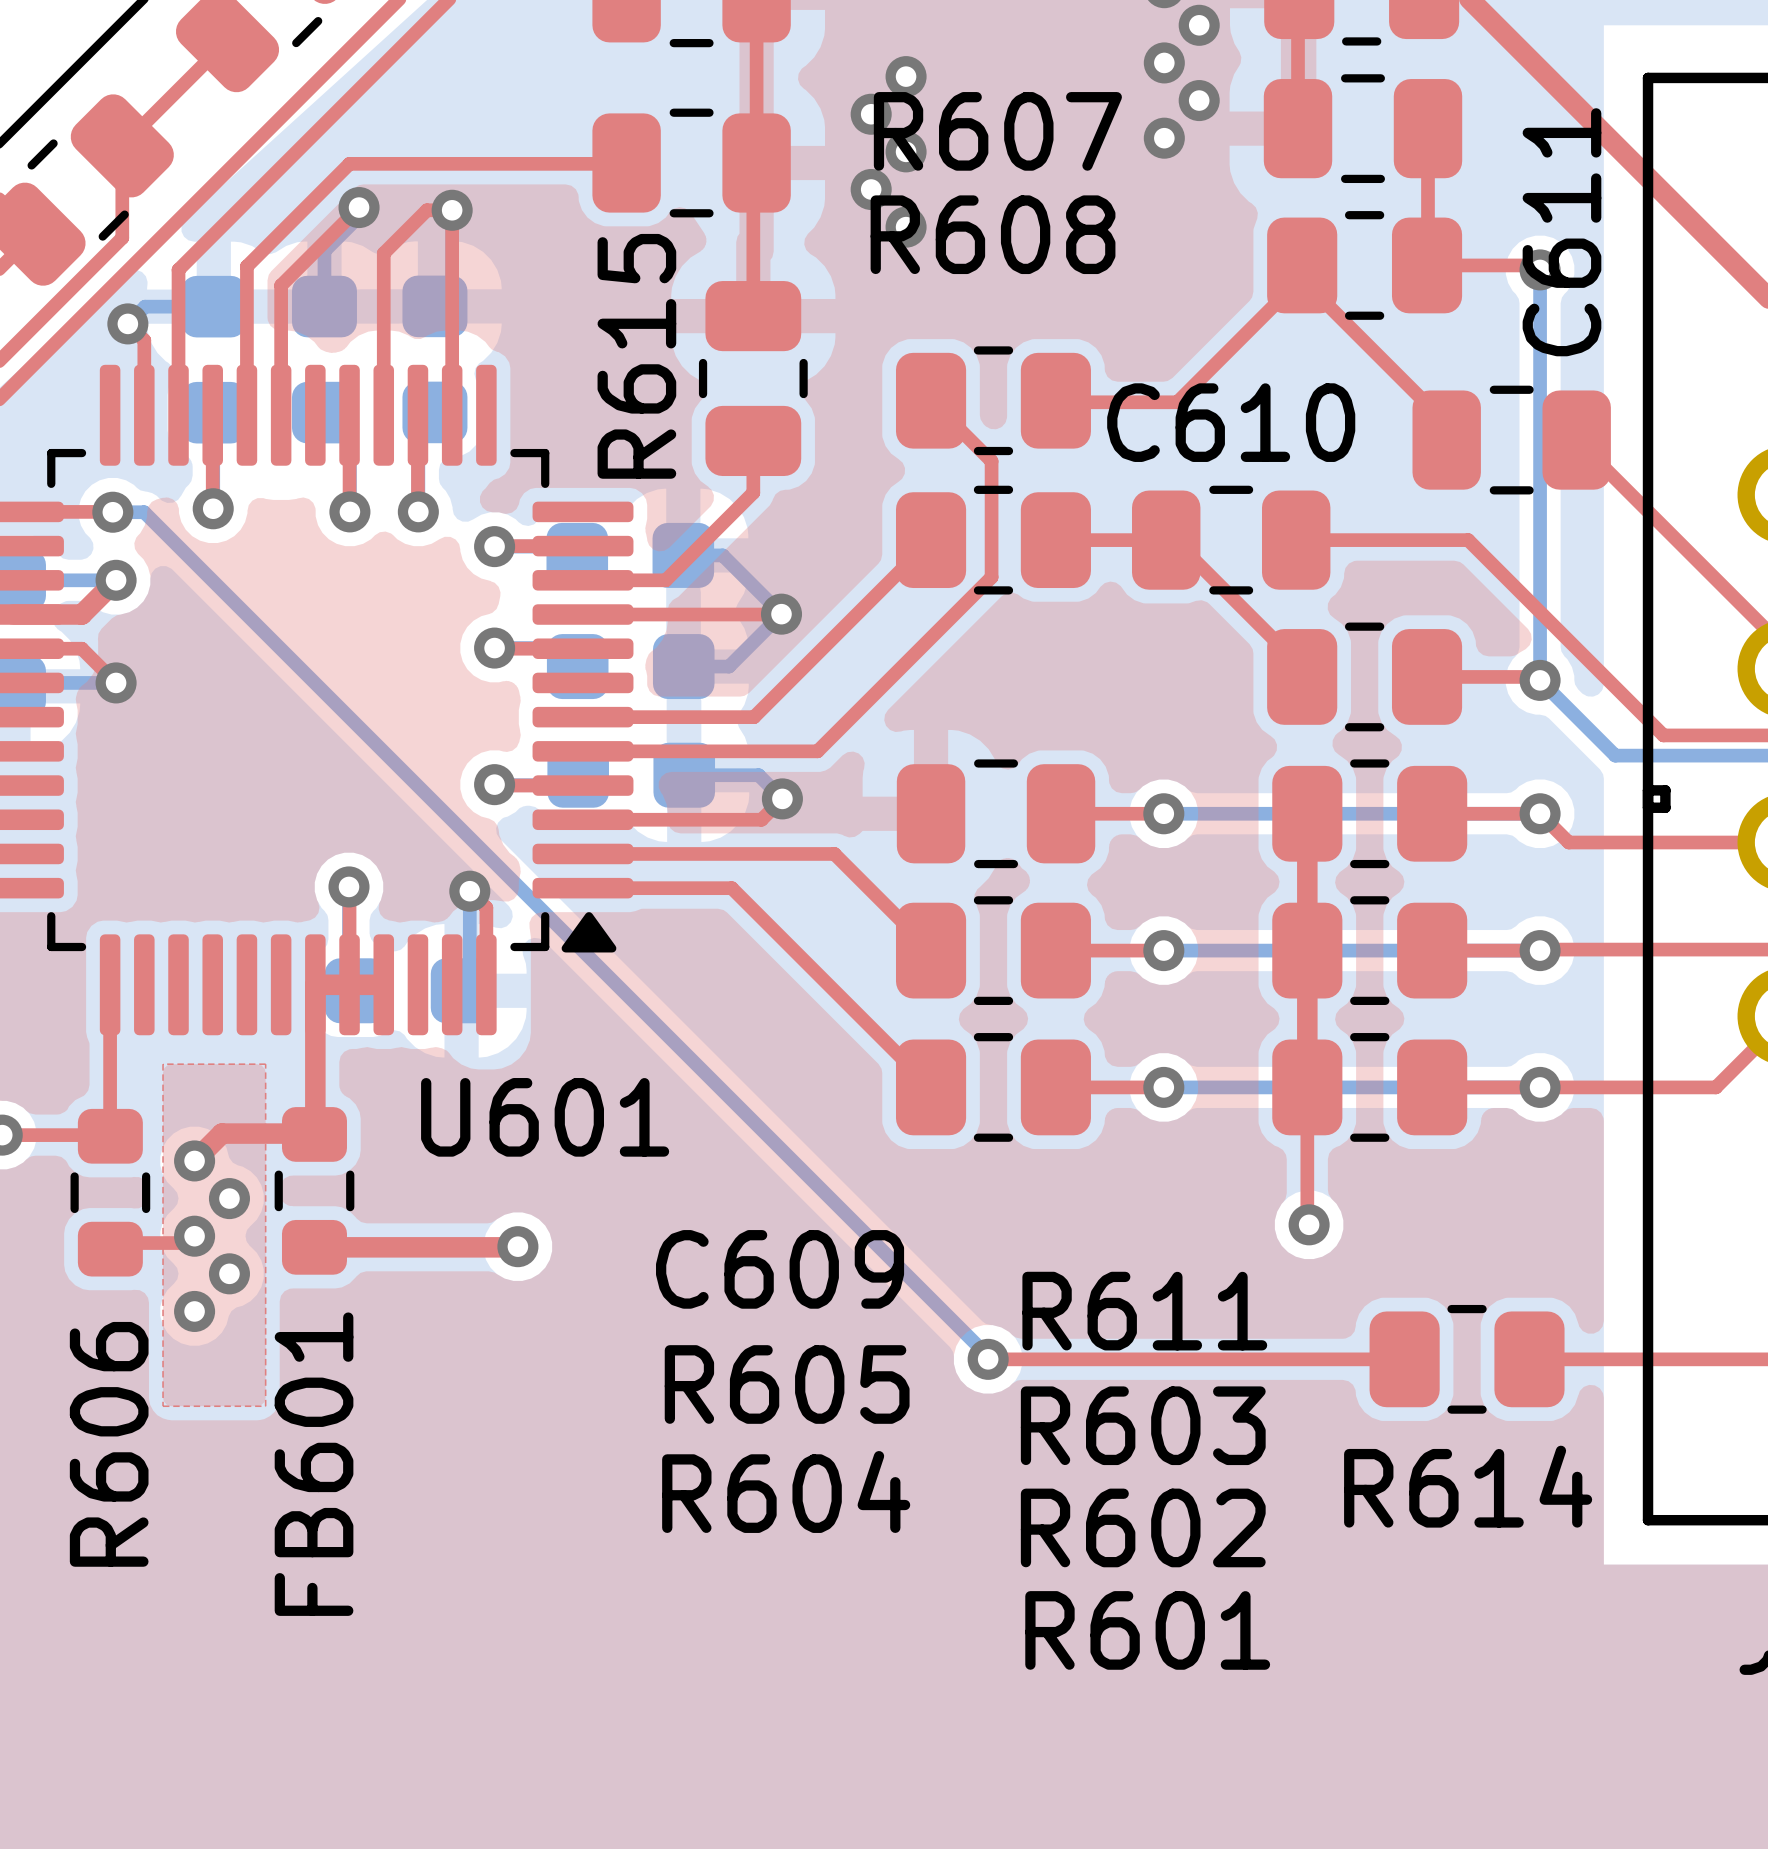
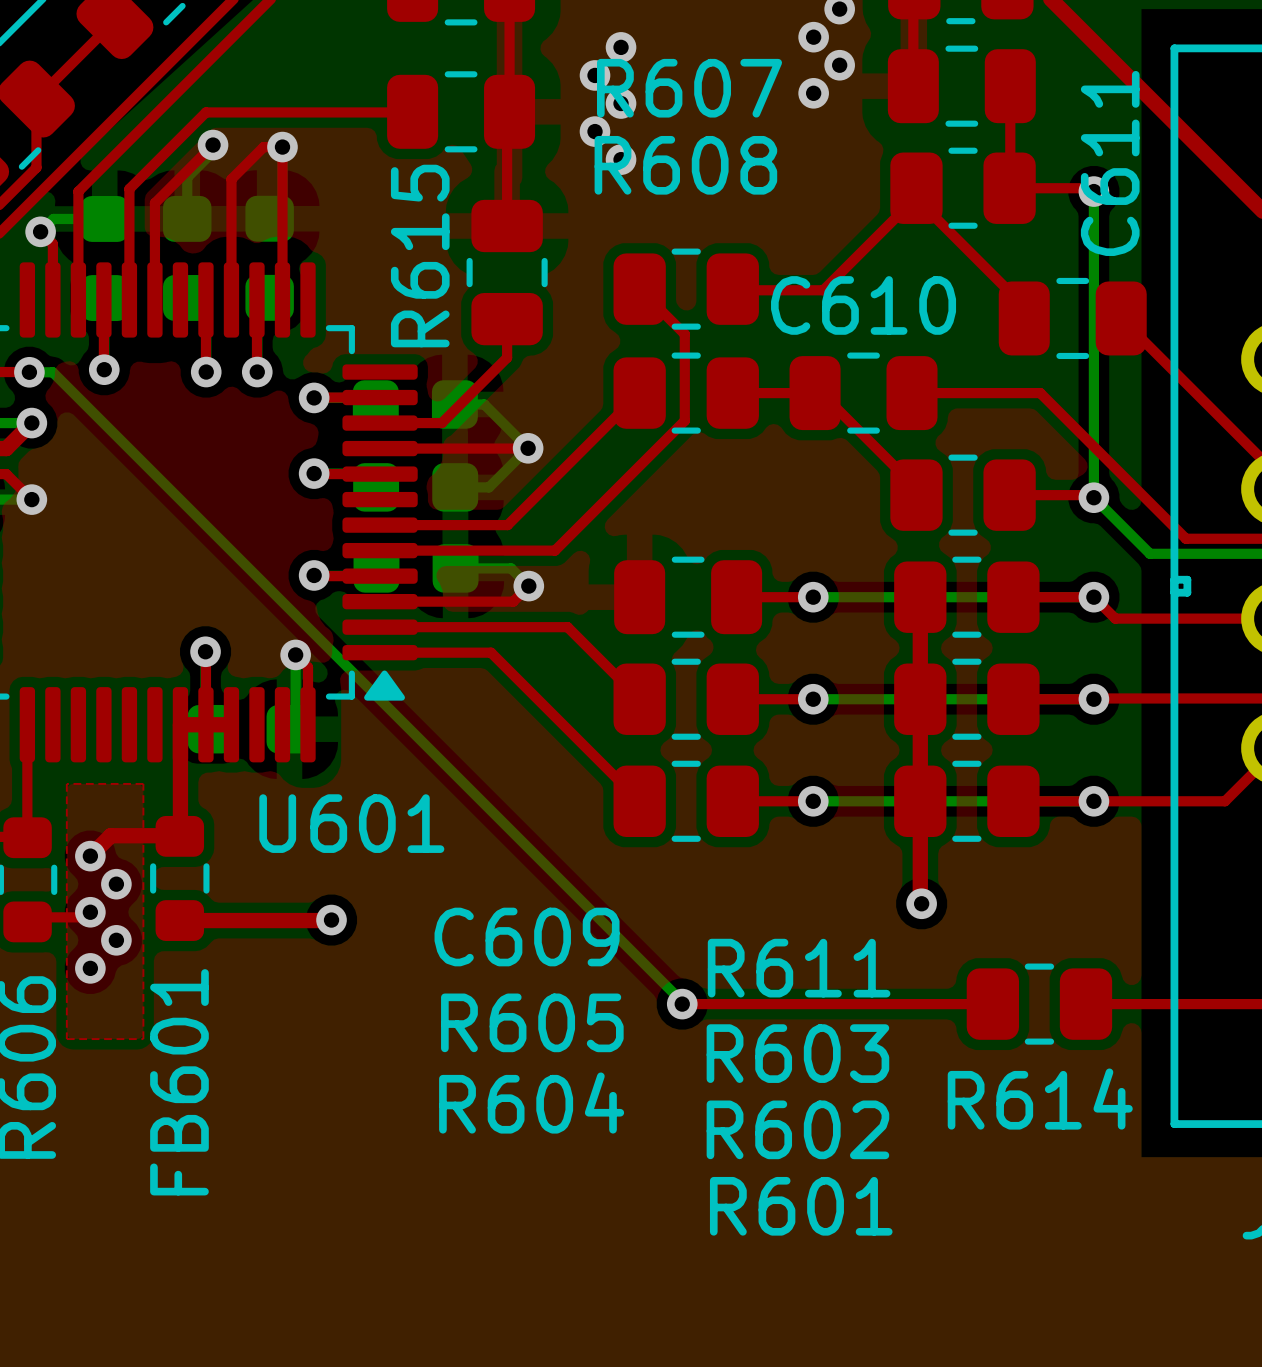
top track width: thin (1307, 1087) (1307, 1223) -> thick (920, 801) (920, 902)

